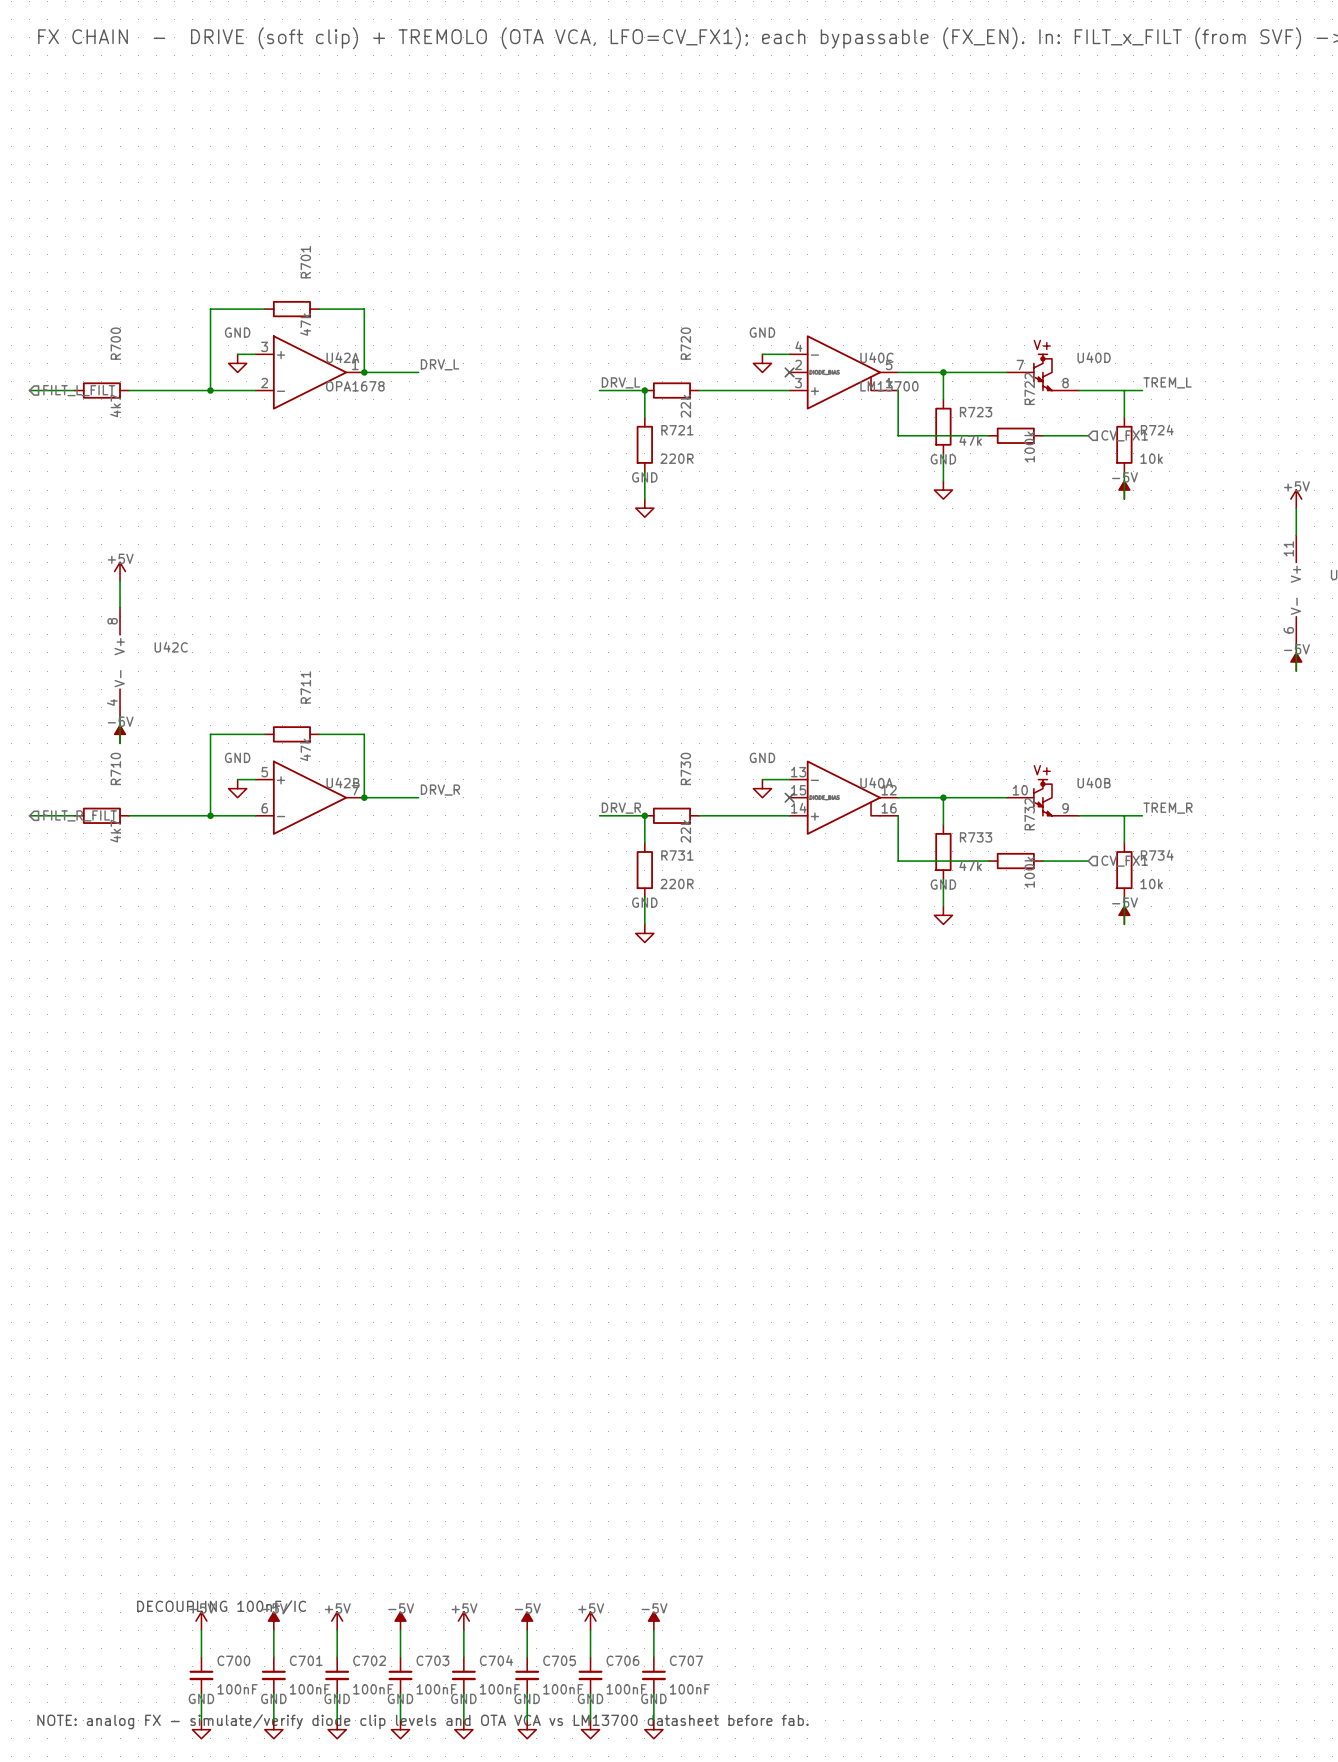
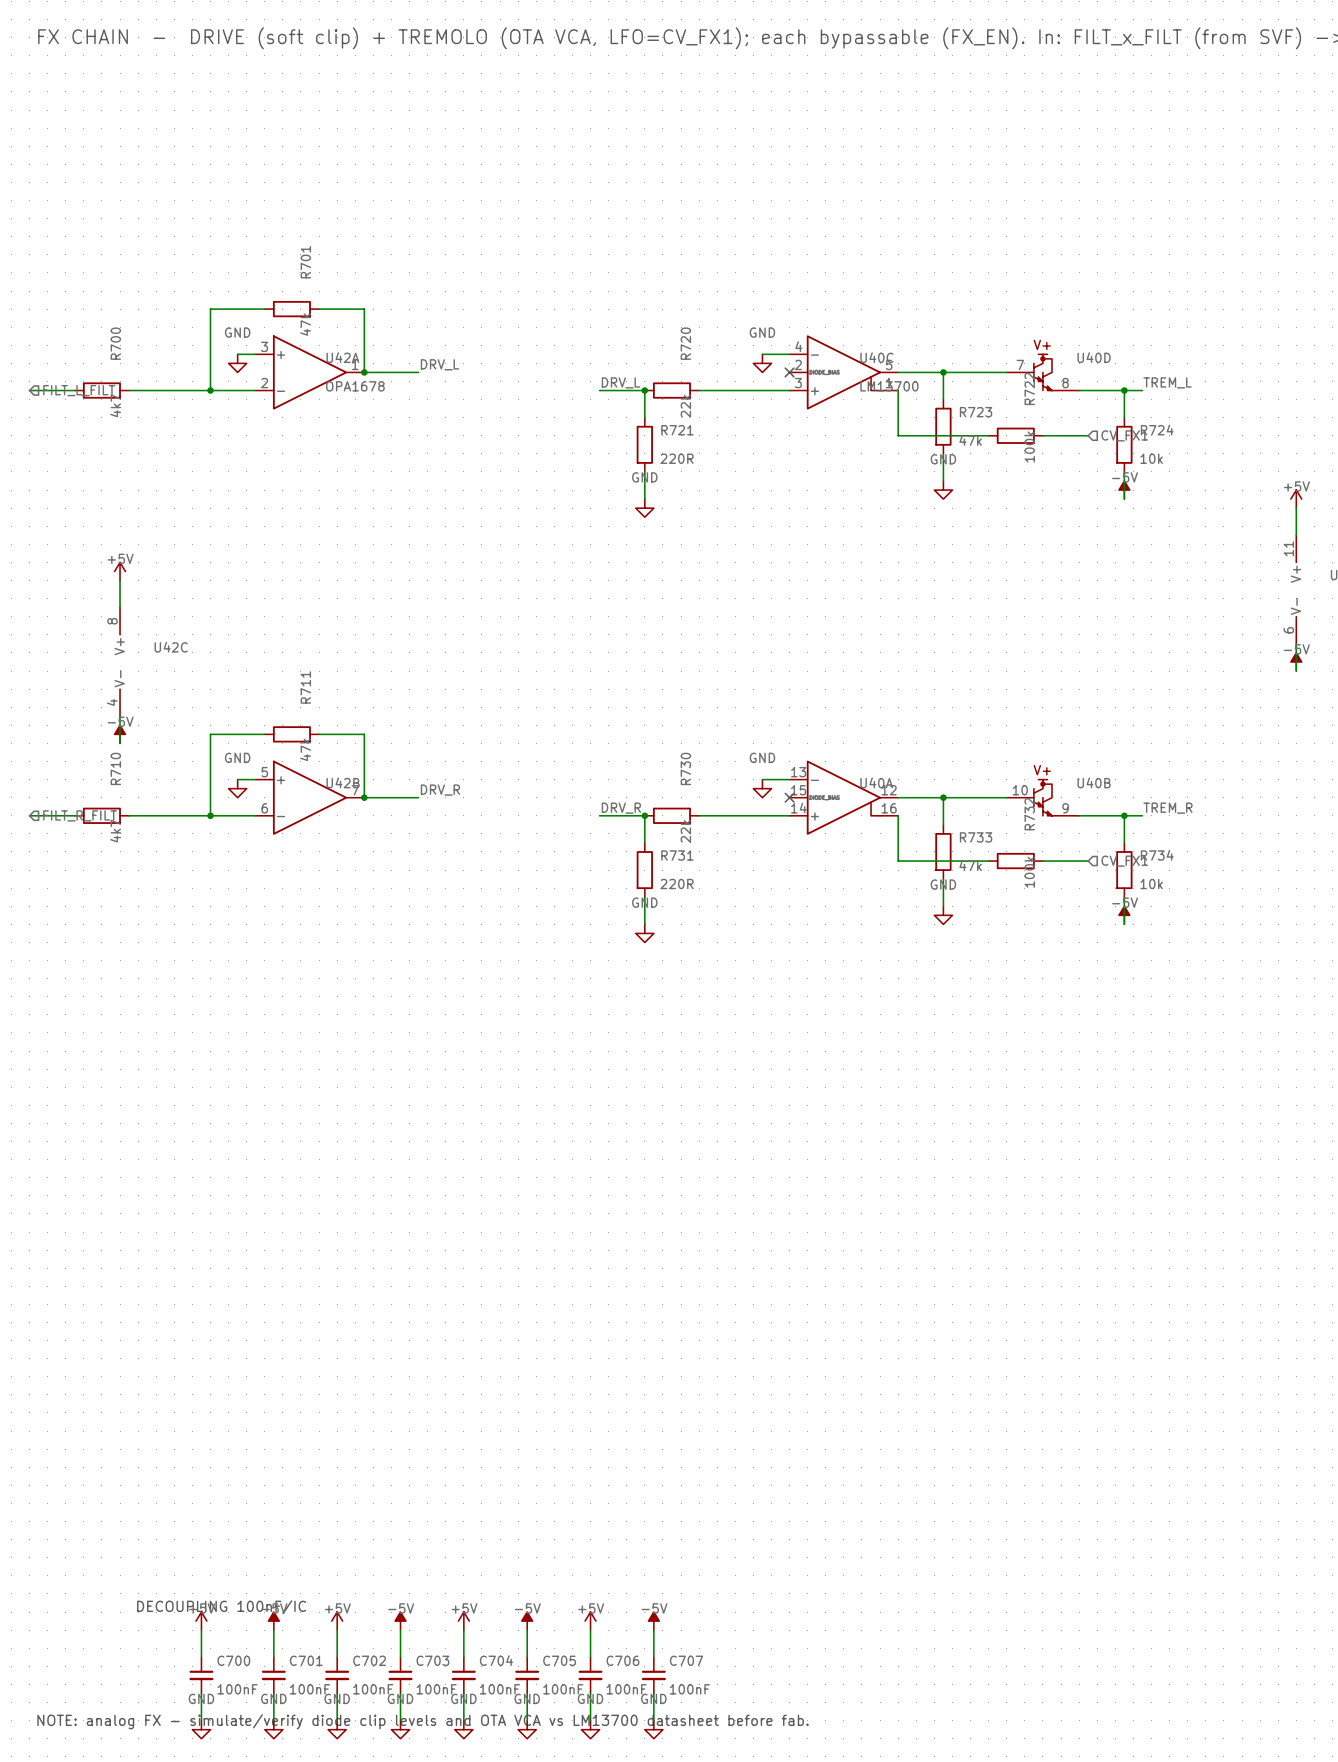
junction: none -> (1124, 390)
junction: none -> (1124, 815)

